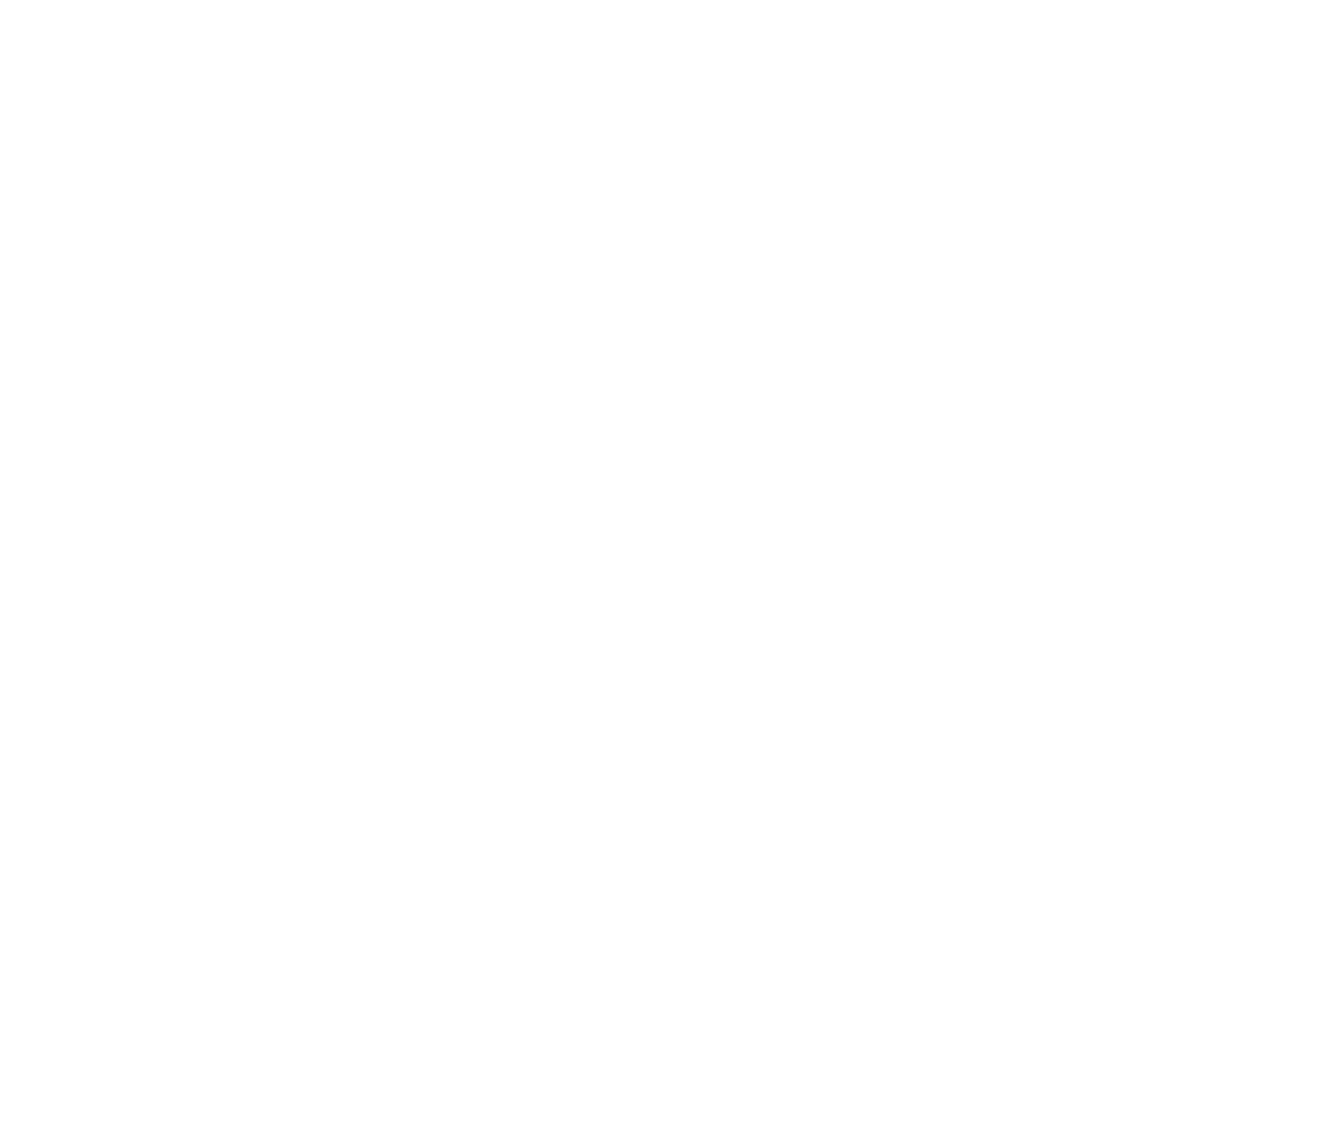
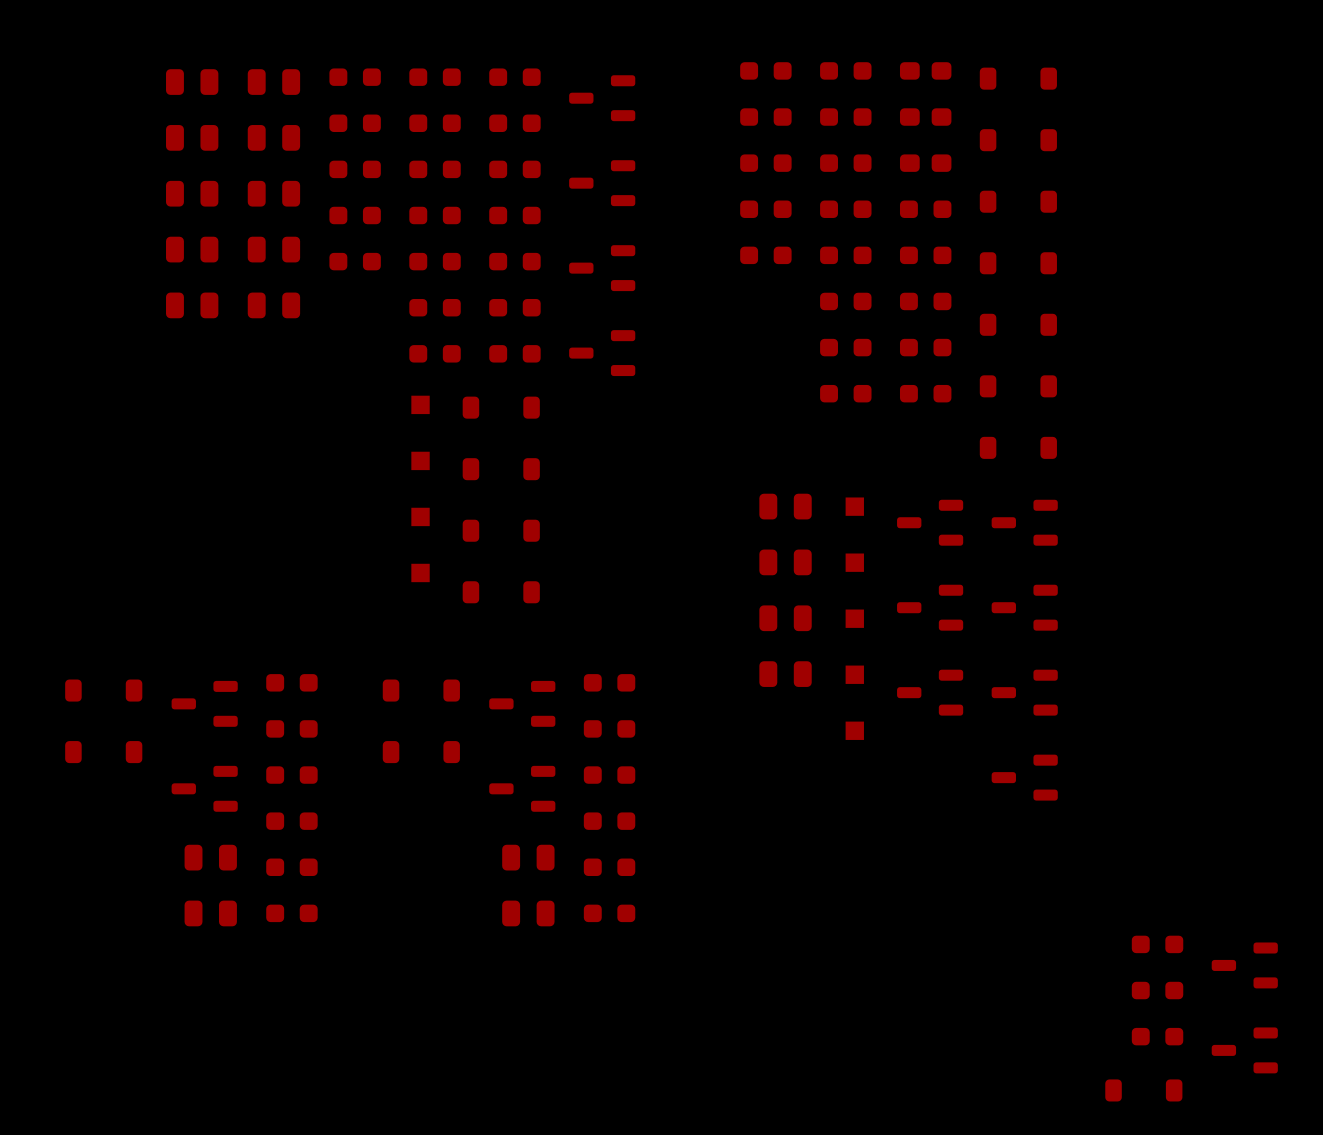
part: none -> (765, 70)
part: none -> (845, 70)
part: none -> (925, 70)
part: none -> (355, 77)
part: none -> (435, 77)
part: none -> (514, 77)
part: none -> (1018, 78)
part: none -> (192, 82)
part: none -> (273, 82)
part: none -> (602, 98)
part: none -> (765, 117)
part: none -> (845, 117)
part: none -> (925, 117)
part: none -> (355, 123)
part: none -> (435, 123)
part: none -> (514, 123)
part: none -> (192, 137)
part: none -> (273, 137)
part: none -> (1018, 140)
part: none -> (765, 163)
part: none -> (845, 163)
part: none -> (925, 163)
part: none -> (355, 169)
part: none -> (435, 169)
part: none -> (514, 169)
part: none -> (602, 183)
part: none -> (192, 193)
part: none -> (273, 193)
part: none -> (1018, 201)
part: none -> (765, 209)
part: none -> (845, 209)
part: none -> (925, 209)
part: none -> (355, 215)
part: none -> (435, 215)
part: none -> (514, 215)
part: none -> (192, 249)
part: none -> (273, 249)
part: none -> (765, 255)
part: none -> (845, 255)
part: none -> (925, 255)
part: none -> (355, 261)
part: none -> (435, 261)
part: none -> (514, 261)
part: none -> (1018, 263)
part: none -> (602, 268)
part: none -> (845, 301)
part: none -> (925, 301)
part: none -> (192, 305)
part: none -> (273, 305)
part: none -> (435, 307)
part: none -> (514, 307)
part: none -> (1018, 324)
part: none -> (845, 347)
part: none -> (925, 347)
part: none -> (435, 353)
part: none -> (514, 353)
part: none -> (602, 353)
part: none -> (1018, 386)
part: none -> (845, 393)
part: none -> (925, 393)
part: none -> (420, 404)
part: none -> (501, 407)
part: none -> (1018, 447)
part: none -> (420, 460)
part: none -> (501, 469)
part: none -> (785, 506)
part: none -> (854, 506)
part: none -> (420, 516)
part: none -> (930, 522)
part: none -> (1024, 522)
part: none -> (501, 530)
part: none -> (785, 562)
part: none -> (854, 562)
part: none -> (420, 572)
part: none -> (501, 592)
part: none -> (930, 607)
part: none -> (1024, 607)
part: none -> (785, 618)
part: none -> (854, 618)
part: none -> (785, 674)
part: none -> (854, 674)
part: none -> (291, 682)
part: none -> (609, 682)
part: none -> (103, 690)
part: none -> (421, 690)
part: none -> (930, 692)
part: none -> (1024, 692)
part: none -> (204, 703)
part: none -> (522, 703)
part: none -> (291, 728)
part: none -> (609, 728)
part: none -> (854, 730)
part: none -> (103, 752)
part: none -> (421, 752)
part: none -> (291, 775)
part: none -> (609, 775)
part: none -> (1024, 777)
part: none -> (204, 788)
part: none -> (522, 788)
part: none -> (291, 821)
part: none -> (609, 821)
part: none -> (210, 857)
part: none -> (528, 857)
part: none -> (291, 867)
part: none -> (609, 867)
part: none -> (210, 913)
part: none -> (291, 913)
part: none -> (528, 913)
part: none -> (609, 913)
part: none -> (1157, 944)
part: none -> (1244, 965)
part: none -> (1157, 990)
part: none -> (1157, 1036)
part: none -> (1244, 1050)
part: none -> (1143, 1090)

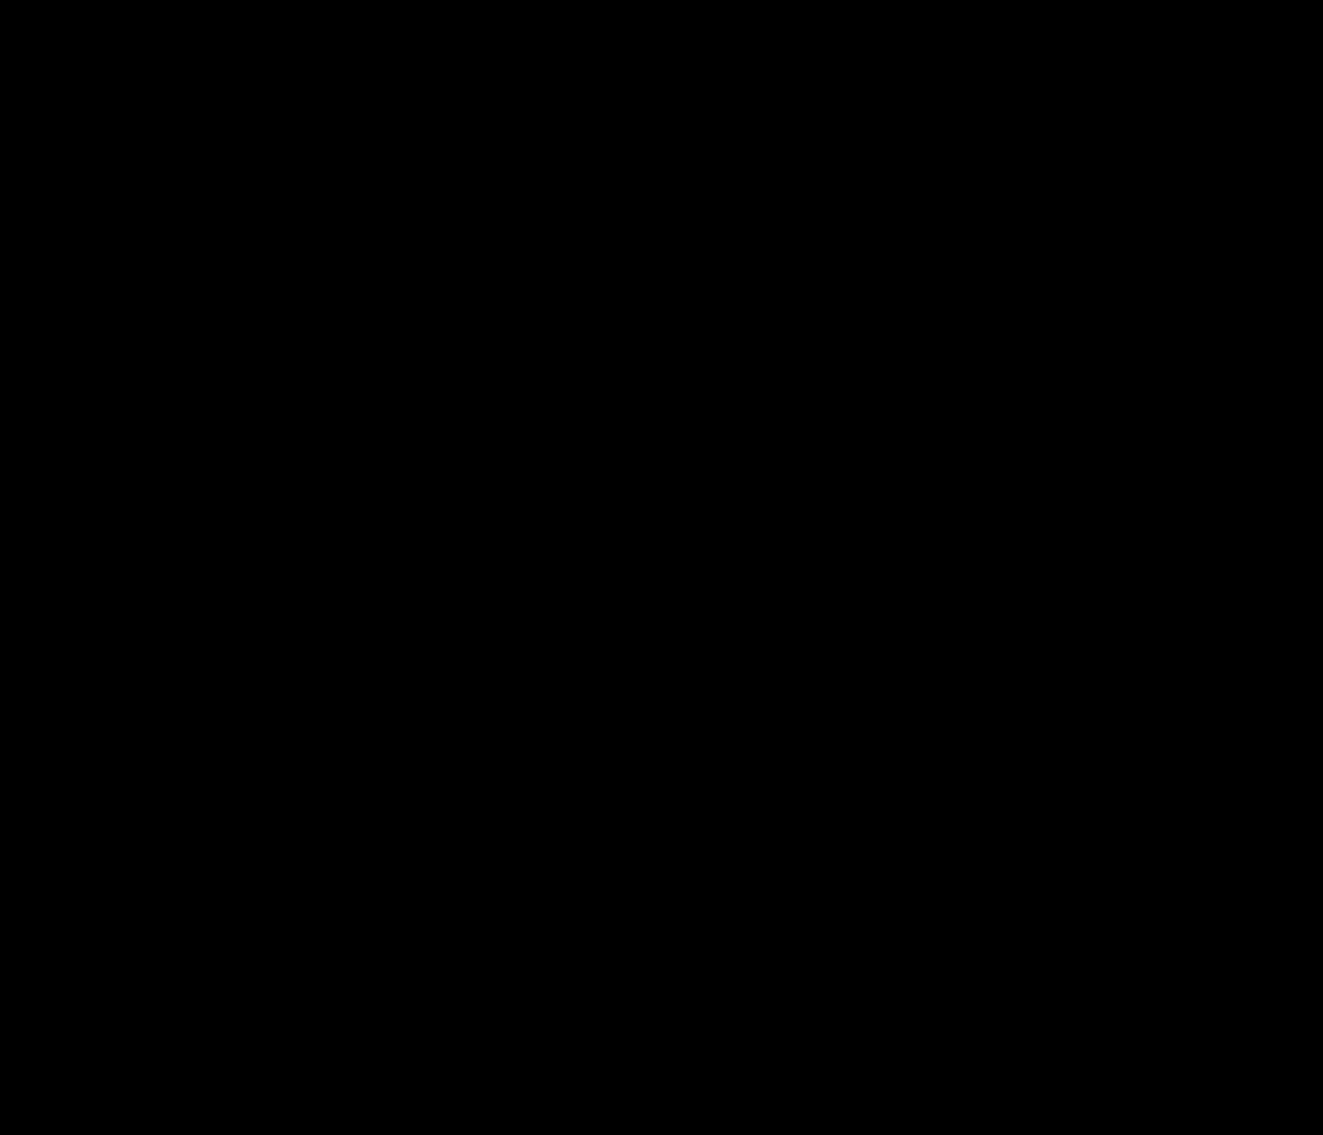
part: (765, 70) -> none
part: (845, 70) -> none
part: (925, 70) -> none
part: (355, 77) -> none
part: (435, 77) -> none
part: (514, 77) -> none
part: (1018, 78) -> none
part: (192, 82) -> none
part: (273, 82) -> none
part: (602, 98) -> none
part: (765, 117) -> none
part: (845, 117) -> none
part: (925, 117) -> none
part: (355, 123) -> none
part: (435, 123) -> none
part: (514, 123) -> none
part: (192, 137) -> none
part: (273, 137) -> none
part: (1018, 140) -> none
part: (765, 163) -> none
part: (845, 163) -> none
part: (925, 163) -> none
part: (355, 169) -> none
part: (435, 169) -> none
part: (514, 169) -> none
part: (602, 183) -> none
part: (192, 193) -> none
part: (273, 193) -> none
part: (1018, 201) -> none
part: (765, 209) -> none
part: (845, 209) -> none
part: (925, 209) -> none
part: (355, 215) -> none
part: (435, 215) -> none
part: (514, 215) -> none
part: (192, 249) -> none
part: (273, 249) -> none
part: (765, 255) -> none
part: (845, 255) -> none
part: (925, 255) -> none
part: (355, 261) -> none
part: (435, 261) -> none
part: (514, 261) -> none
part: (1018, 263) -> none
part: (602, 268) -> none
part: (845, 301) -> none
part: (925, 301) -> none
part: (192, 305) -> none
part: (273, 305) -> none
part: (435, 307) -> none
part: (514, 307) -> none
part: (1018, 324) -> none
part: (845, 347) -> none
part: (925, 347) -> none
part: (435, 353) -> none
part: (514, 353) -> none
part: (602, 353) -> none
part: (1018, 386) -> none
part: (845, 393) -> none
part: (925, 393) -> none
part: (420, 404) -> none
part: (501, 407) -> none
part: (1018, 447) -> none
part: (420, 460) -> none
part: (501, 469) -> none
part: (785, 506) -> none
part: (854, 506) -> none
part: (420, 516) -> none
part: (930, 522) -> none
part: (1024, 522) -> none
part: (501, 530) -> none
part: (785, 562) -> none
part: (854, 562) -> none
part: (420, 572) -> none
part: (501, 592) -> none
part: (930, 607) -> none
part: (1024, 607) -> none
part: (785, 618) -> none
part: (854, 618) -> none
part: (785, 674) -> none
part: (854, 674) -> none
part: (291, 682) -> none
part: (609, 682) -> none
part: (103, 690) -> none
part: (421, 690) -> none
part: (930, 692) -> none
part: (1024, 692) -> none
part: (204, 703) -> none
part: (522, 703) -> none
part: (291, 728) -> none
part: (609, 728) -> none
part: (854, 730) -> none
part: (103, 752) -> none
part: (421, 752) -> none
part: (291, 775) -> none
part: (609, 775) -> none
part: (1024, 777) -> none
part: (204, 788) -> none
part: (522, 788) -> none
part: (291, 821) -> none
part: (609, 821) -> none
part: (210, 857) -> none
part: (528, 857) -> none
part: (291, 867) -> none
part: (609, 867) -> none
part: (210, 913) -> none
part: (291, 913) -> none
part: (528, 913) -> none
part: (609, 913) -> none
part: (1157, 944) -> none
part: (1244, 965) -> none
part: (1157, 990) -> none
part: (1157, 1036) -> none
part: (1244, 1050) -> none
part: (1143, 1090) -> none

